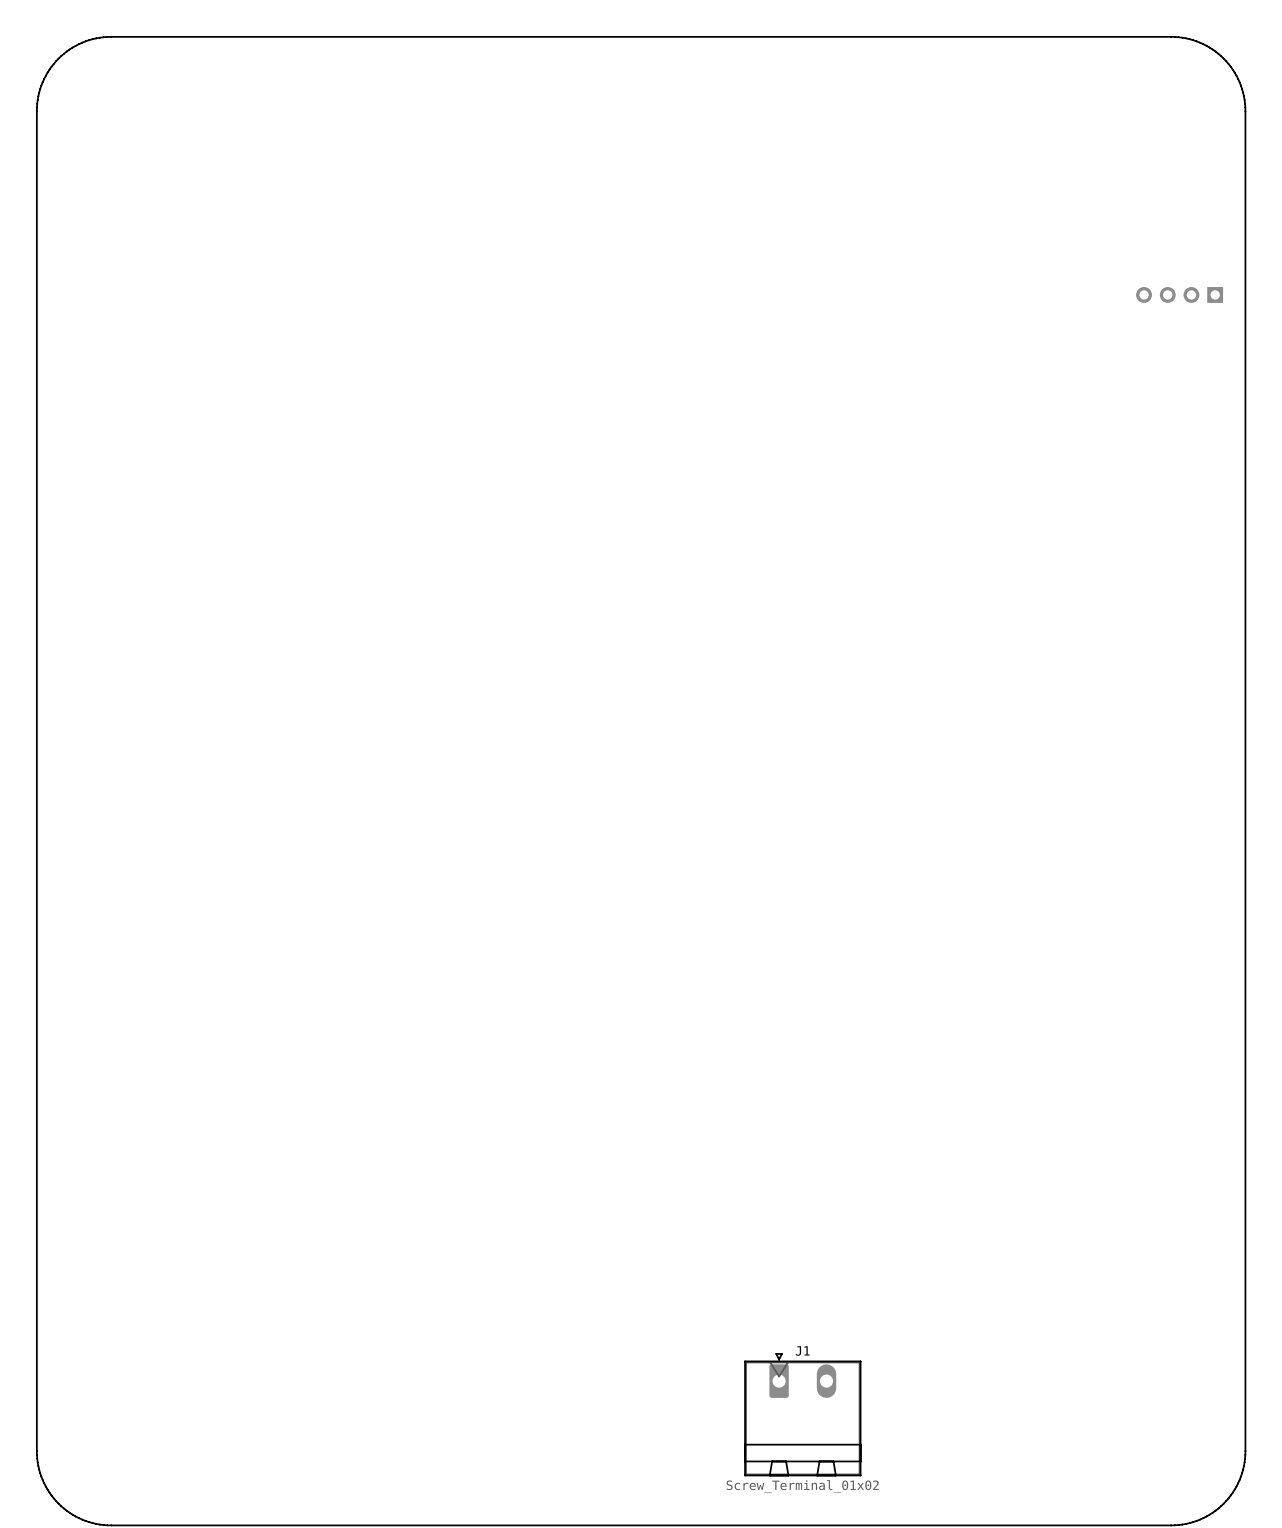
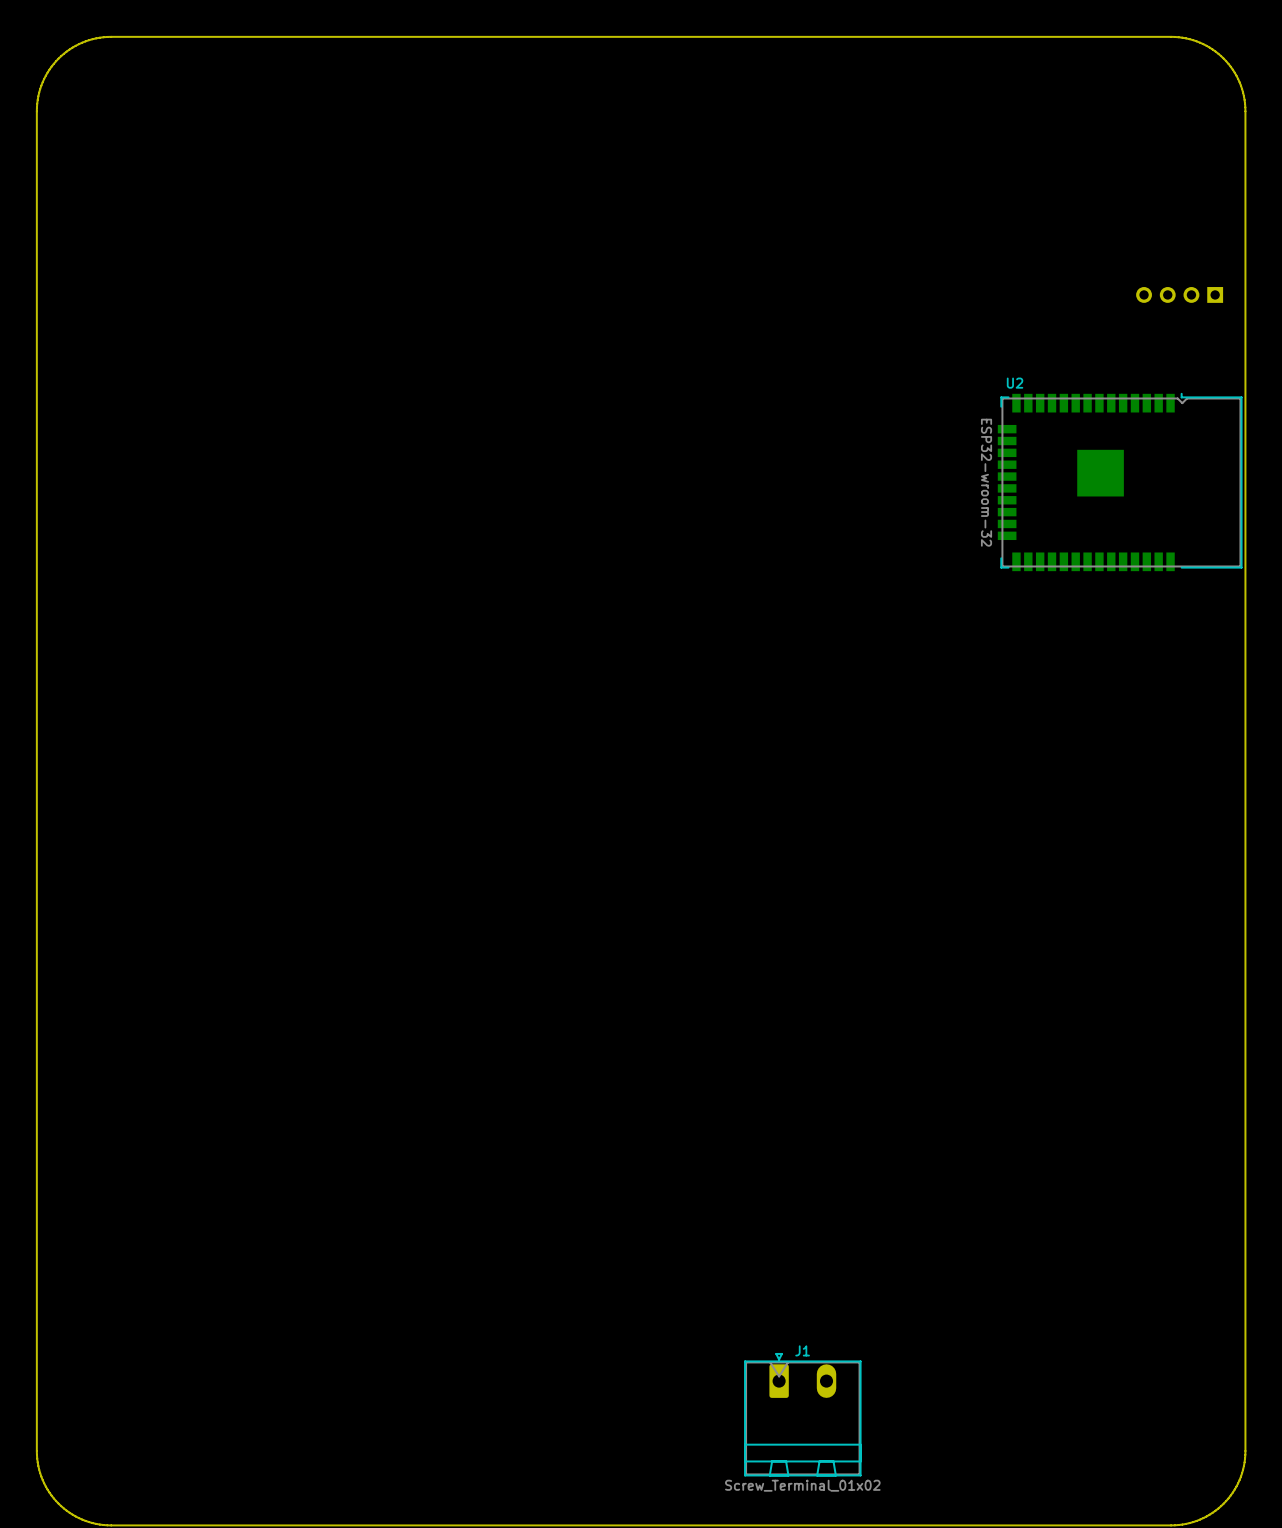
U2: none -> ESP32-wroom-32 (1119, 482)

